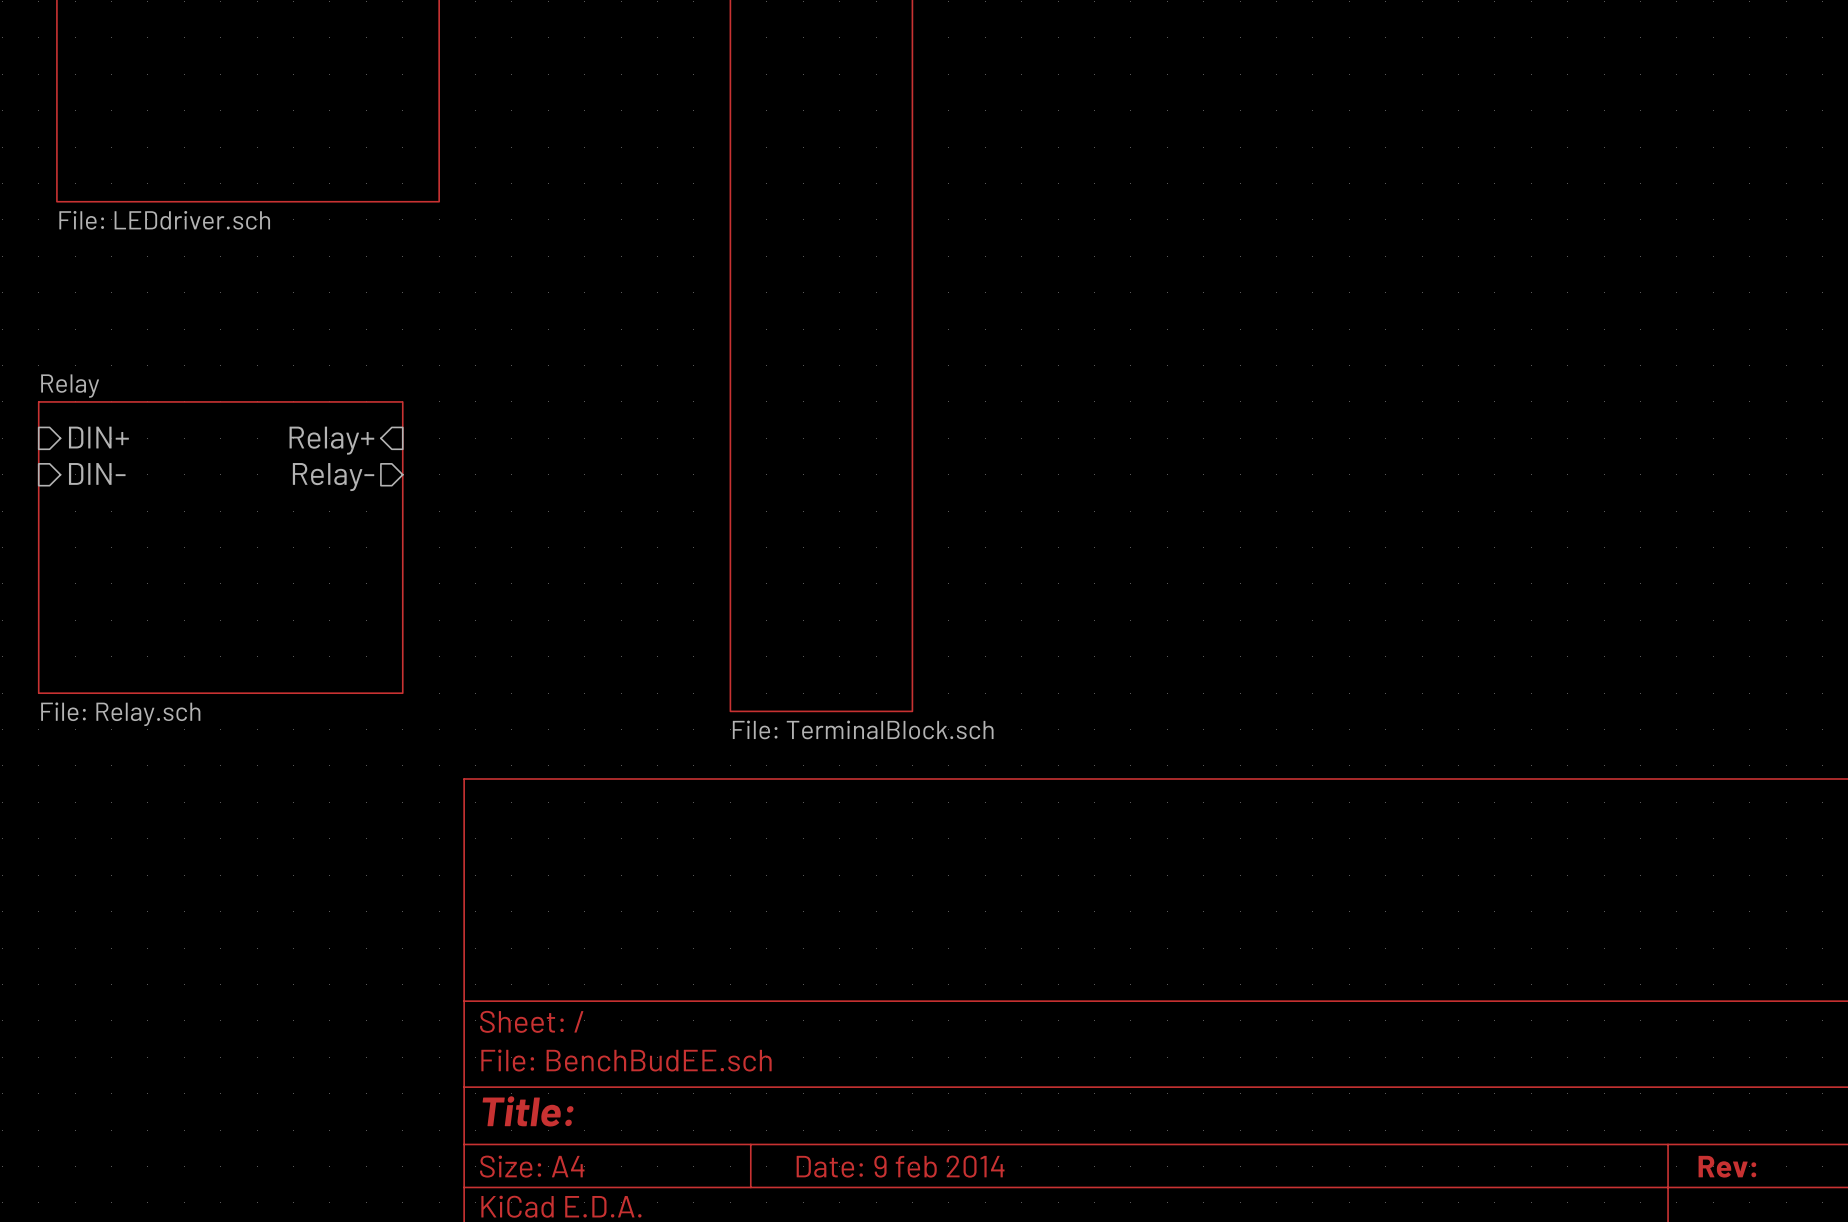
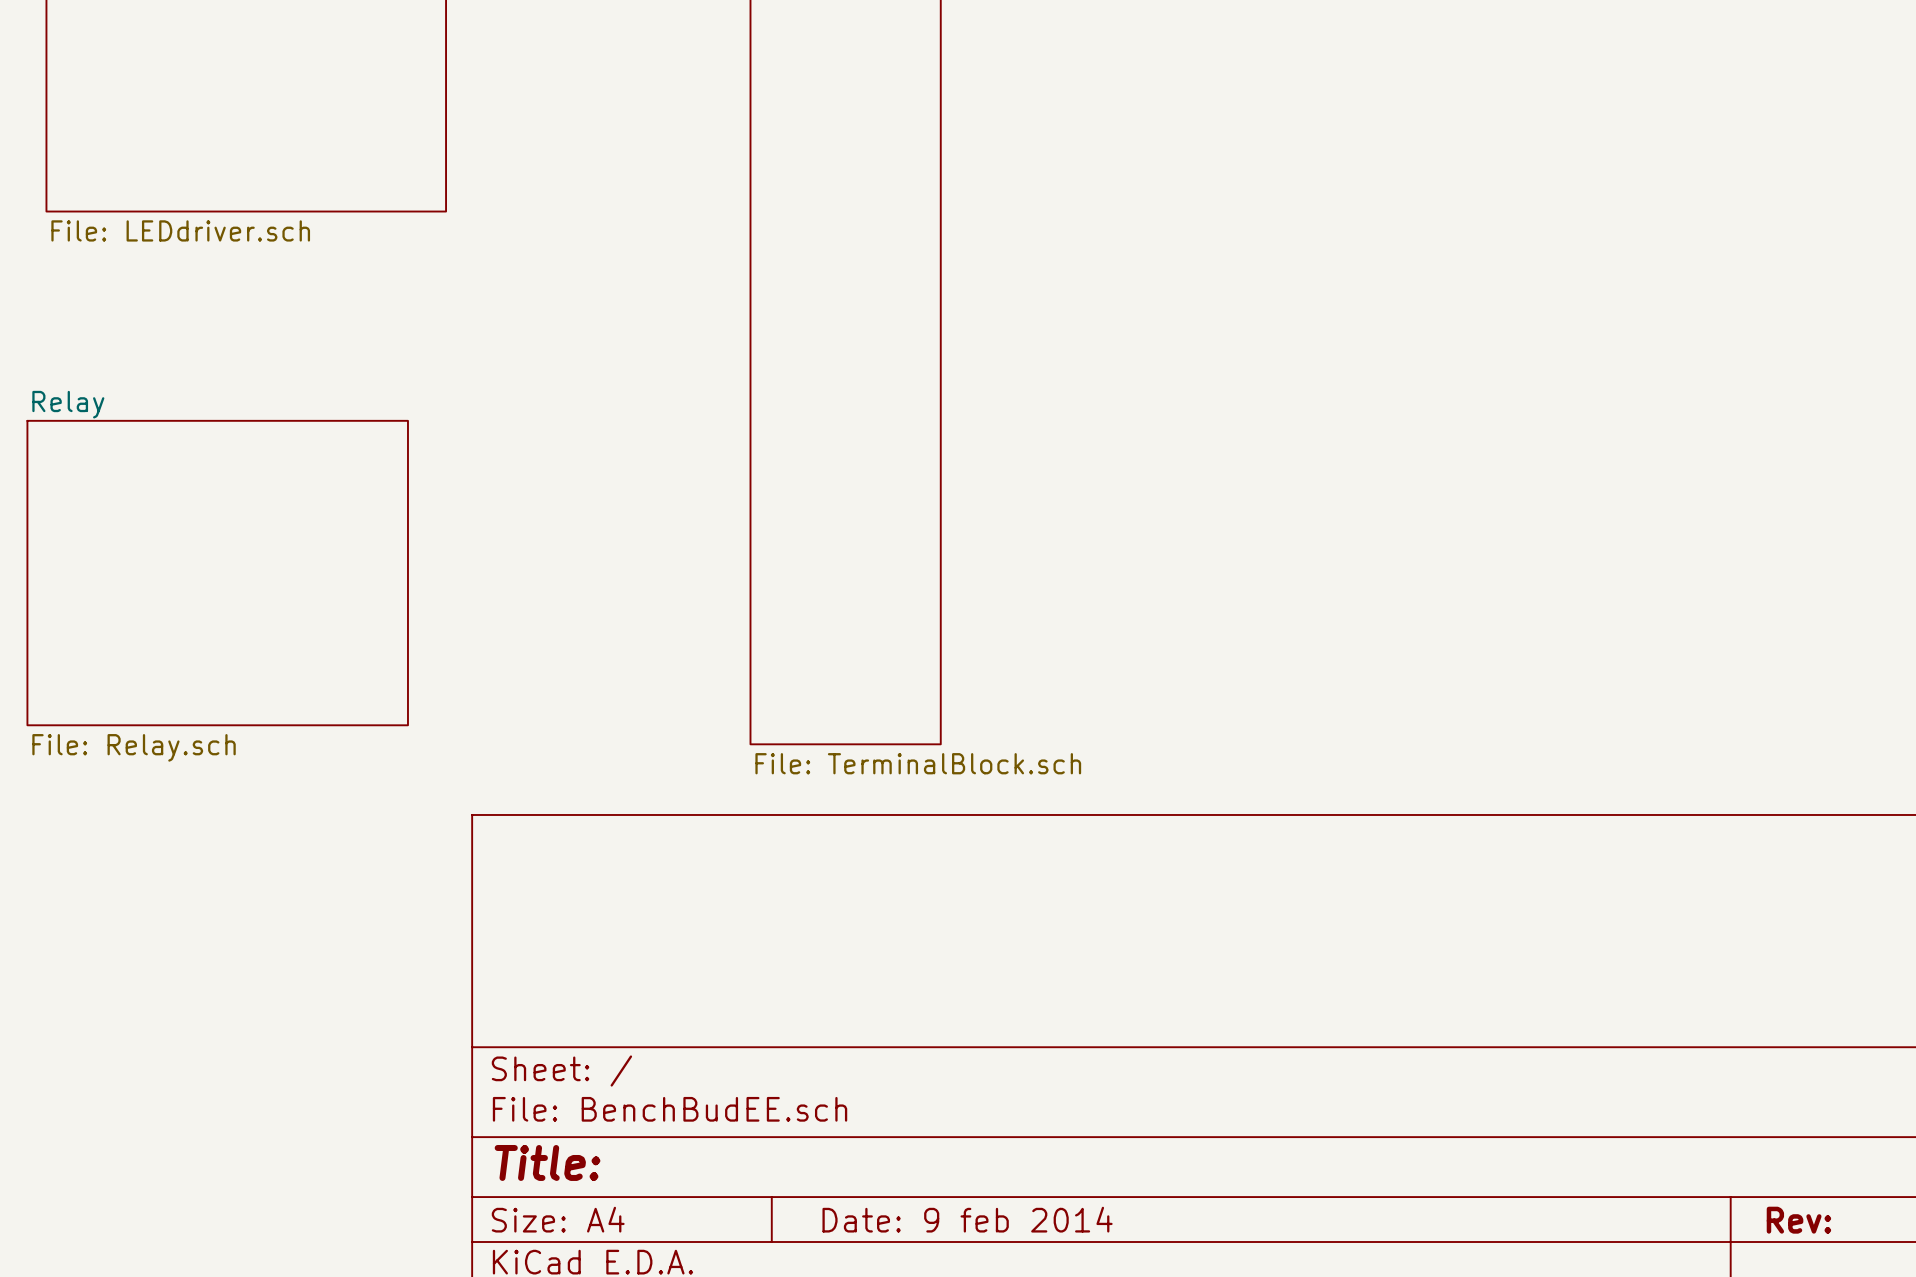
sheet pin: DIN+ (98, 437) -> none
sheet pin: Relay+ (331, 440) -> none
sheet pin: DIN- (97, 473) -> none
sheet pin: Relay- (333, 477) -> none

